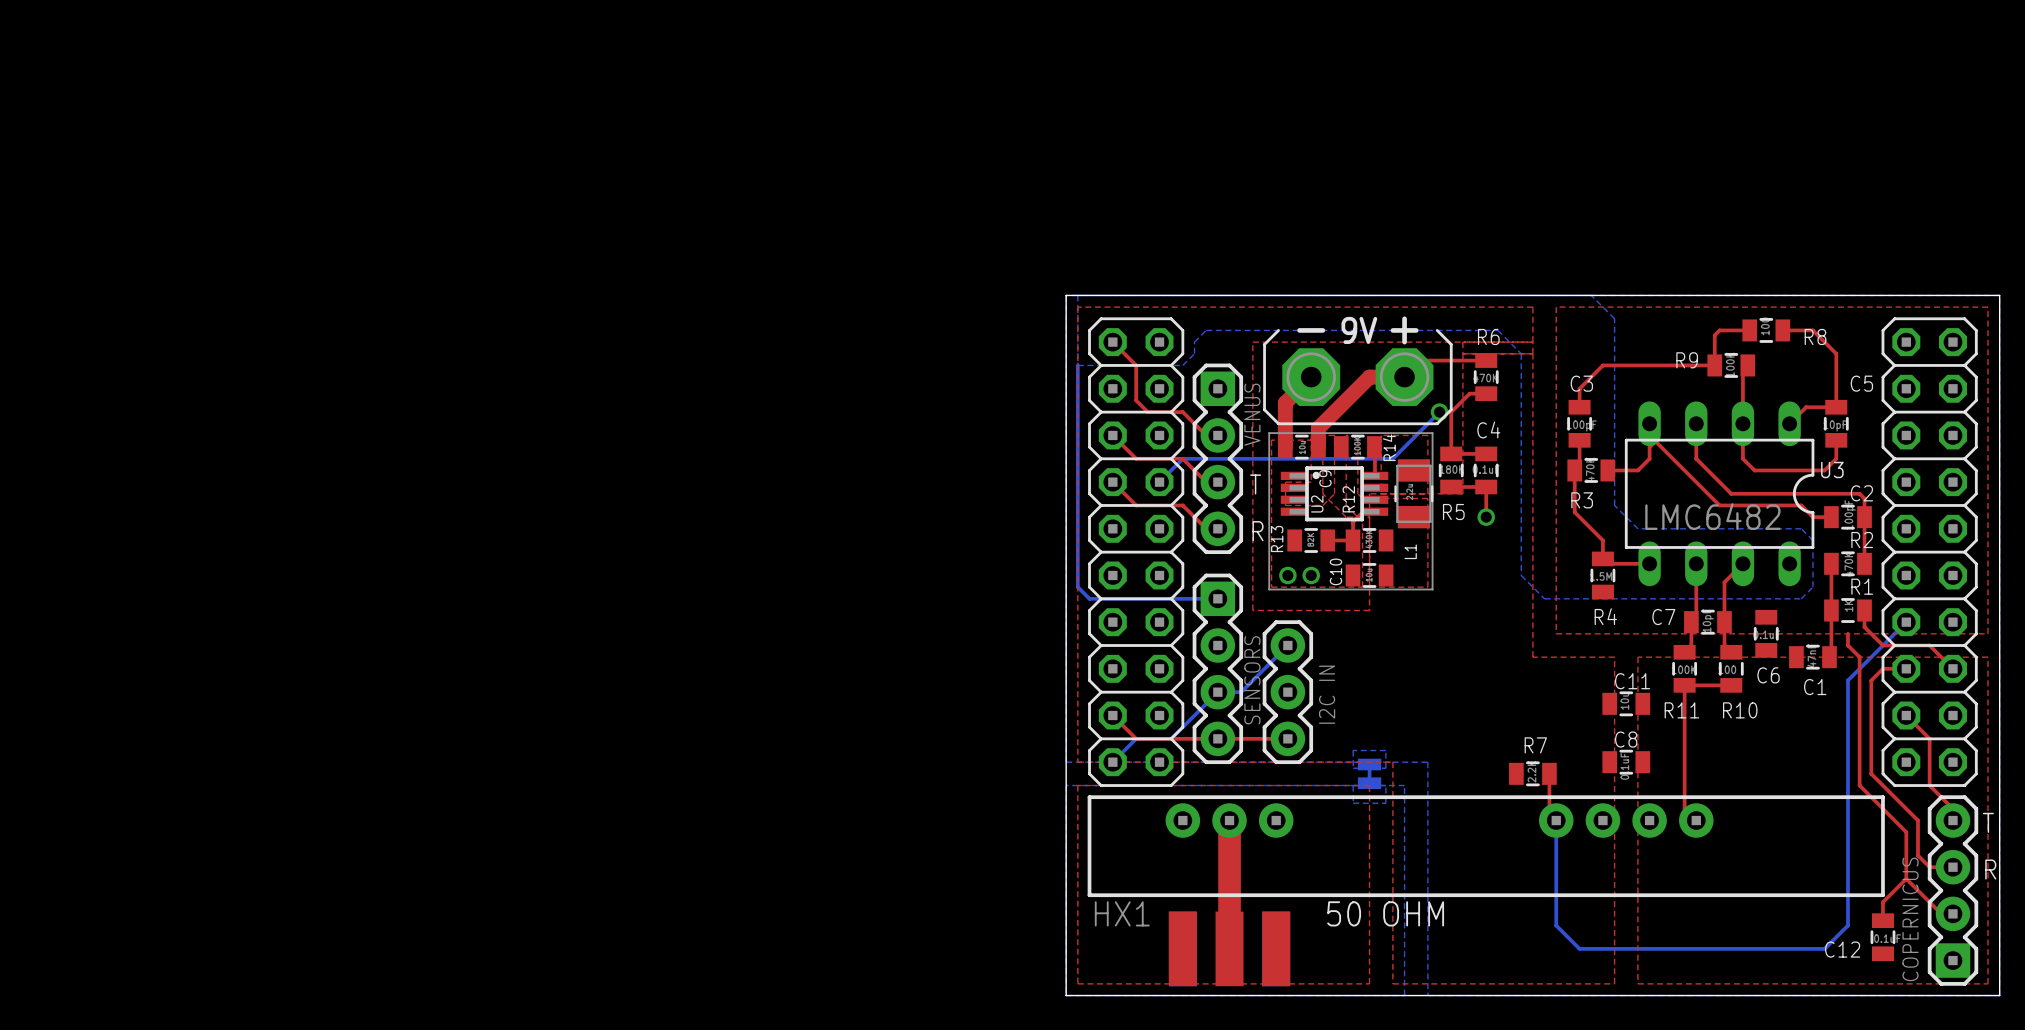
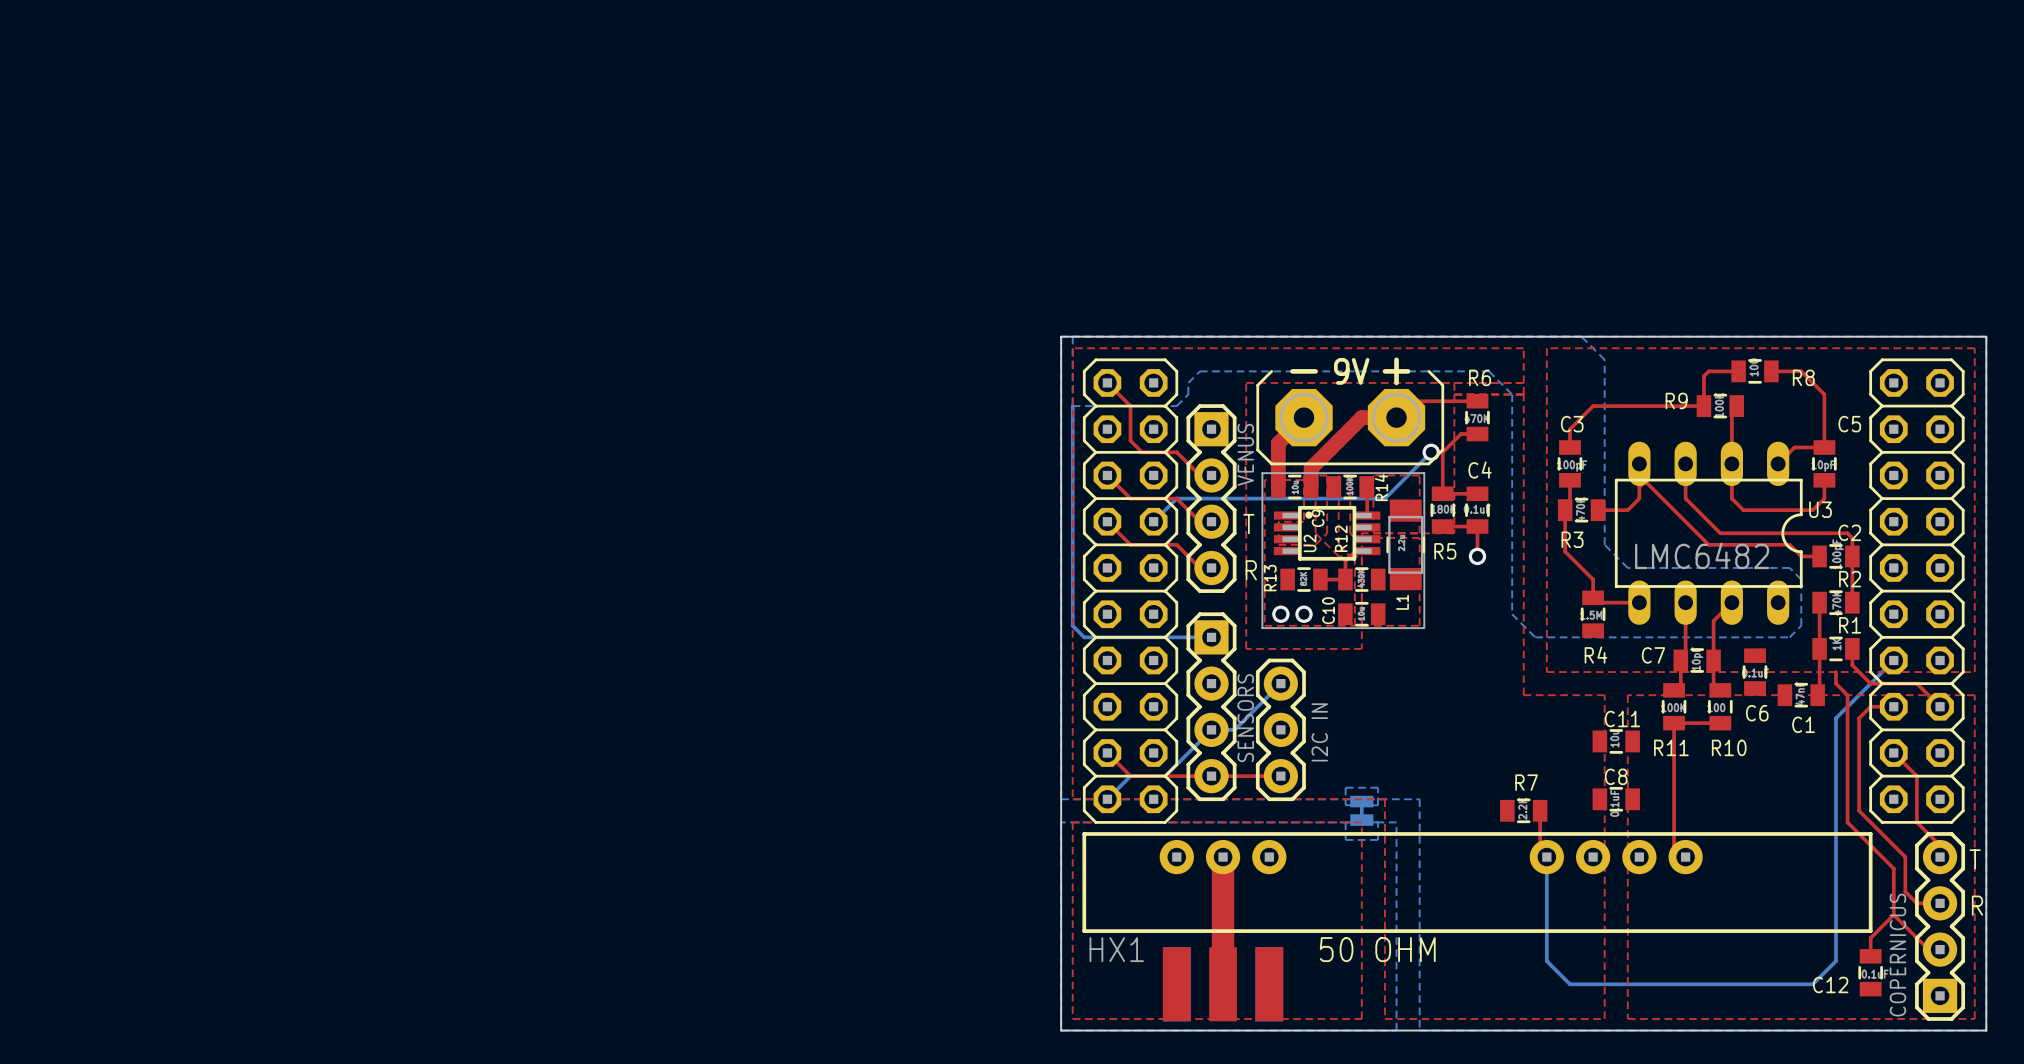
L1 footprint: [1394, 459, 1434, 529] -> [1386, 499, 1426, 591]

